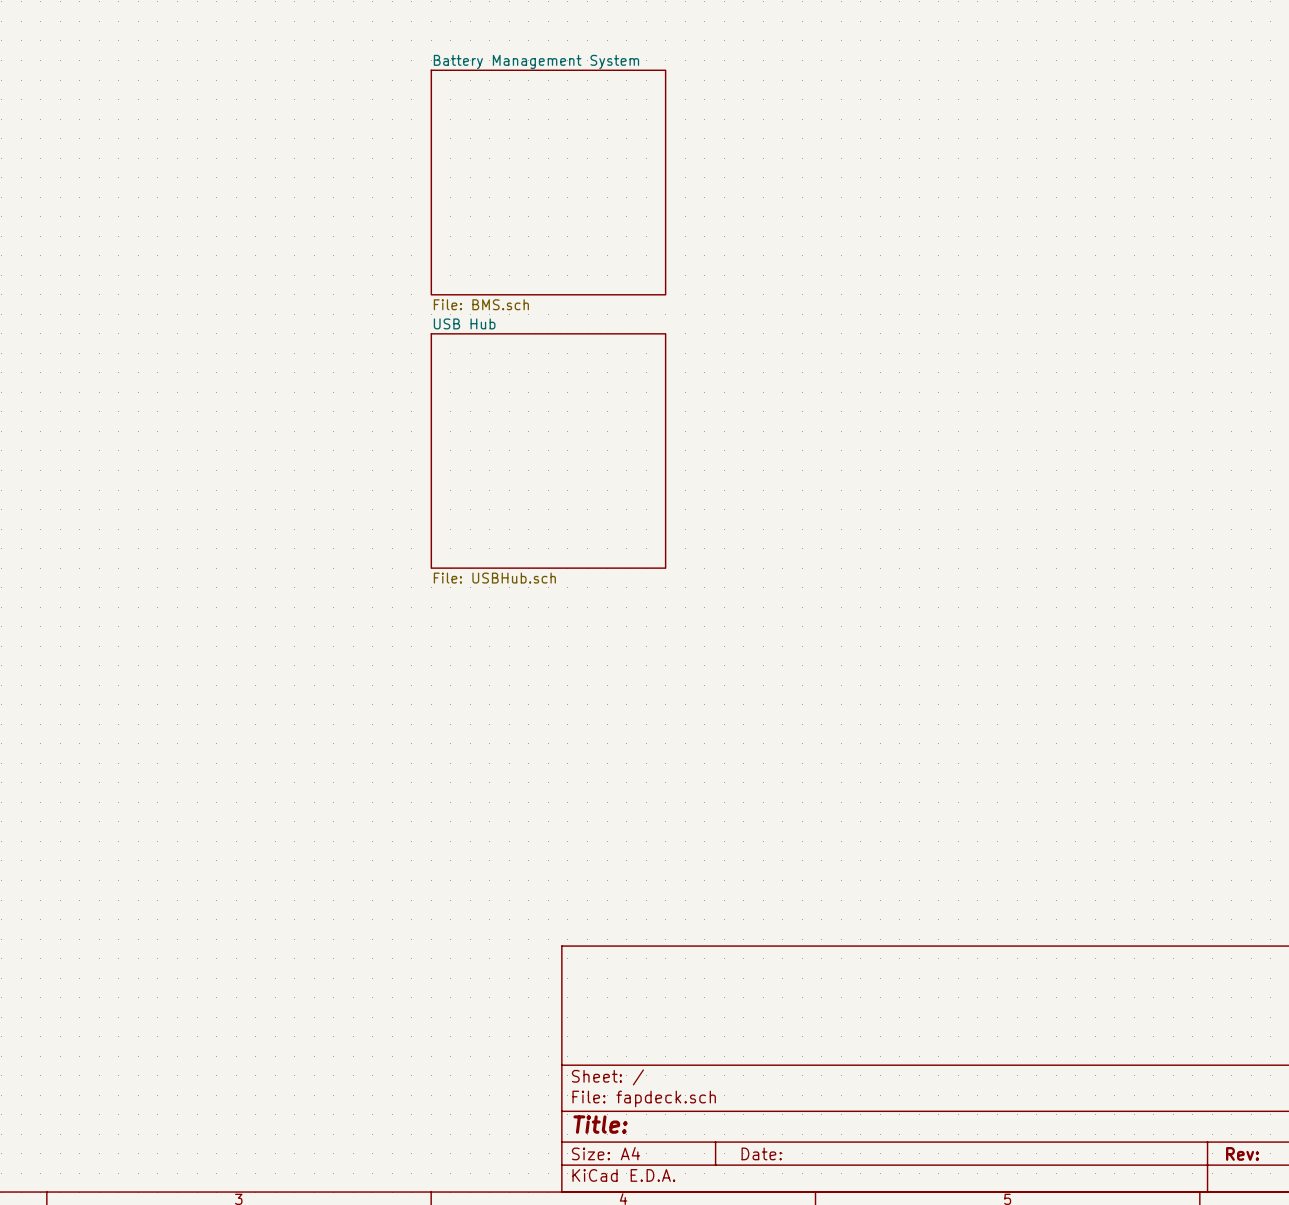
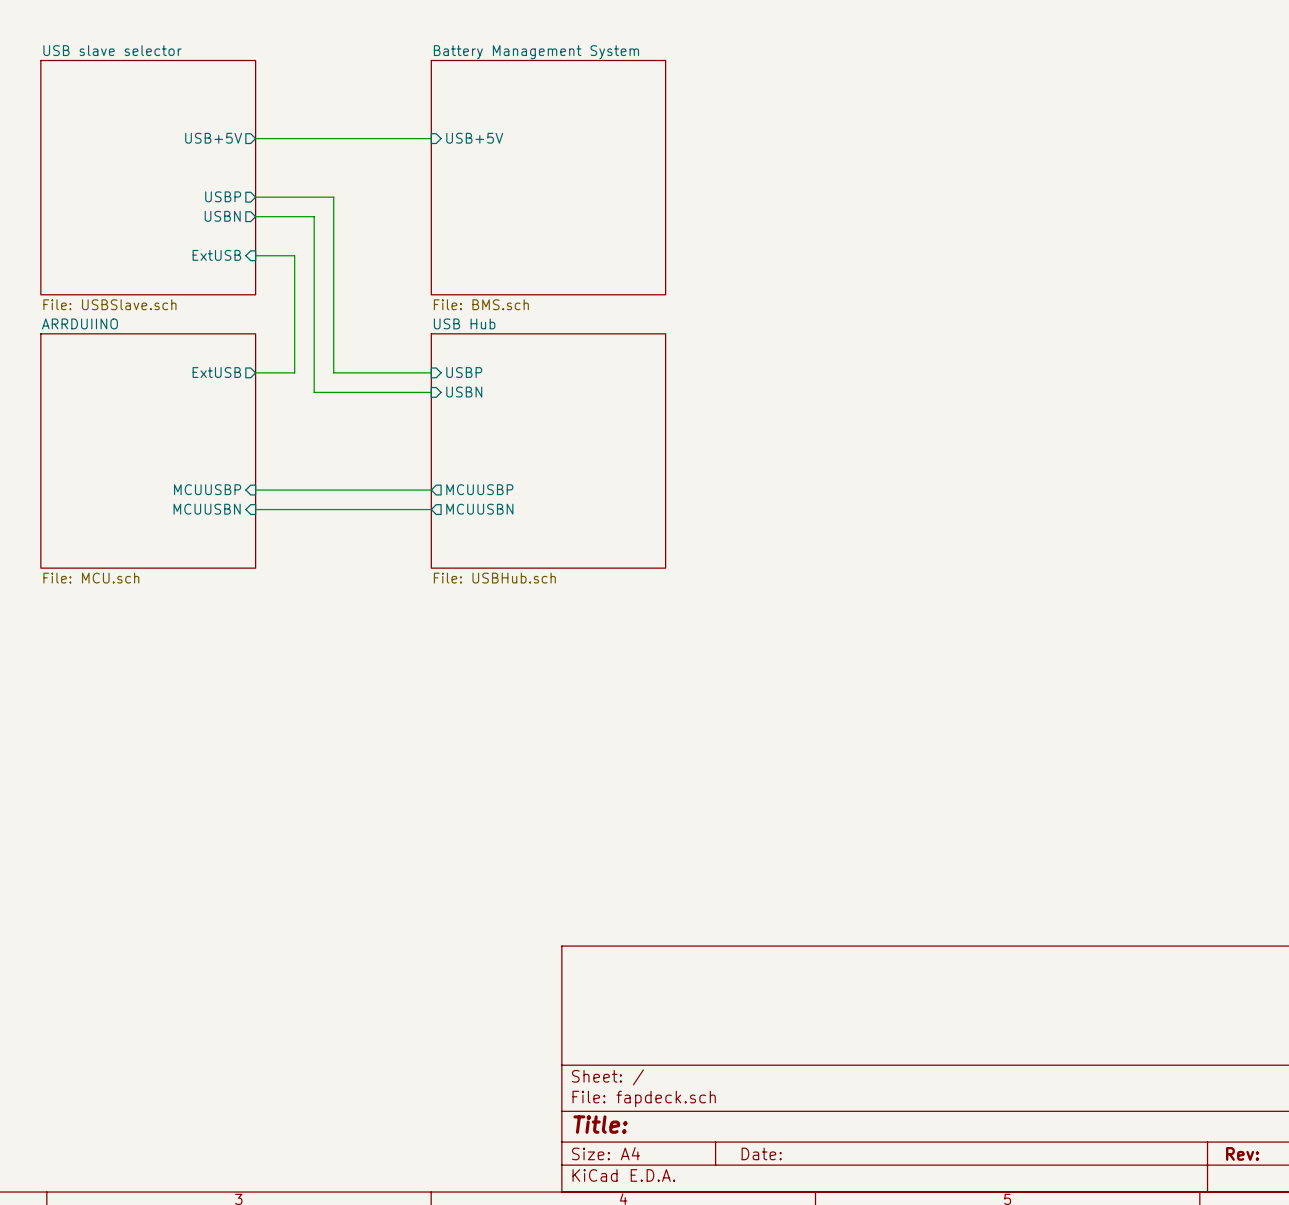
sheet Battery Management System shape: [431, 70, 666, 295] -> [431, 60, 666, 295]
sheet pin: none -> USB+5V (213, 138)
wire: none -> (255, 138) (431, 138)
sheet pin: none -> USB+5V (474, 138)
sheet USB slave selector: none -> File: USBSlave.sch (148, 177)
sheet pin: none -> USBP (223, 196)
wire: none -> (255, 197) (333, 197) (333, 372) (431, 372)
sheet pin: none -> USBN (222, 216)
wire: none -> (255, 216) (314, 216) (314, 392) (431, 392)
sheet pin: none -> ExtUSB (216, 255)
wire: none -> (255, 255) (294, 255) (294, 372) (255, 372)
sheet pin: none -> ExtUSB (216, 372)
sheet pin: none -> USBP (464, 372)
sheet pin: none -> USBN (464, 392)
sheet ARRDUIINO: none -> File: MCU.sch (148, 450)
sheet pin: none -> MCUUSBP (207, 489)
sheet pin: none -> MCUUSBP (479, 489)
wire: none -> (255, 490) (431, 490)
sheet pin: none -> MCUUSBN (207, 509)
wire: none -> (255, 509) (431, 509)
sheet pin: none -> MCUUSBN (479, 509)

